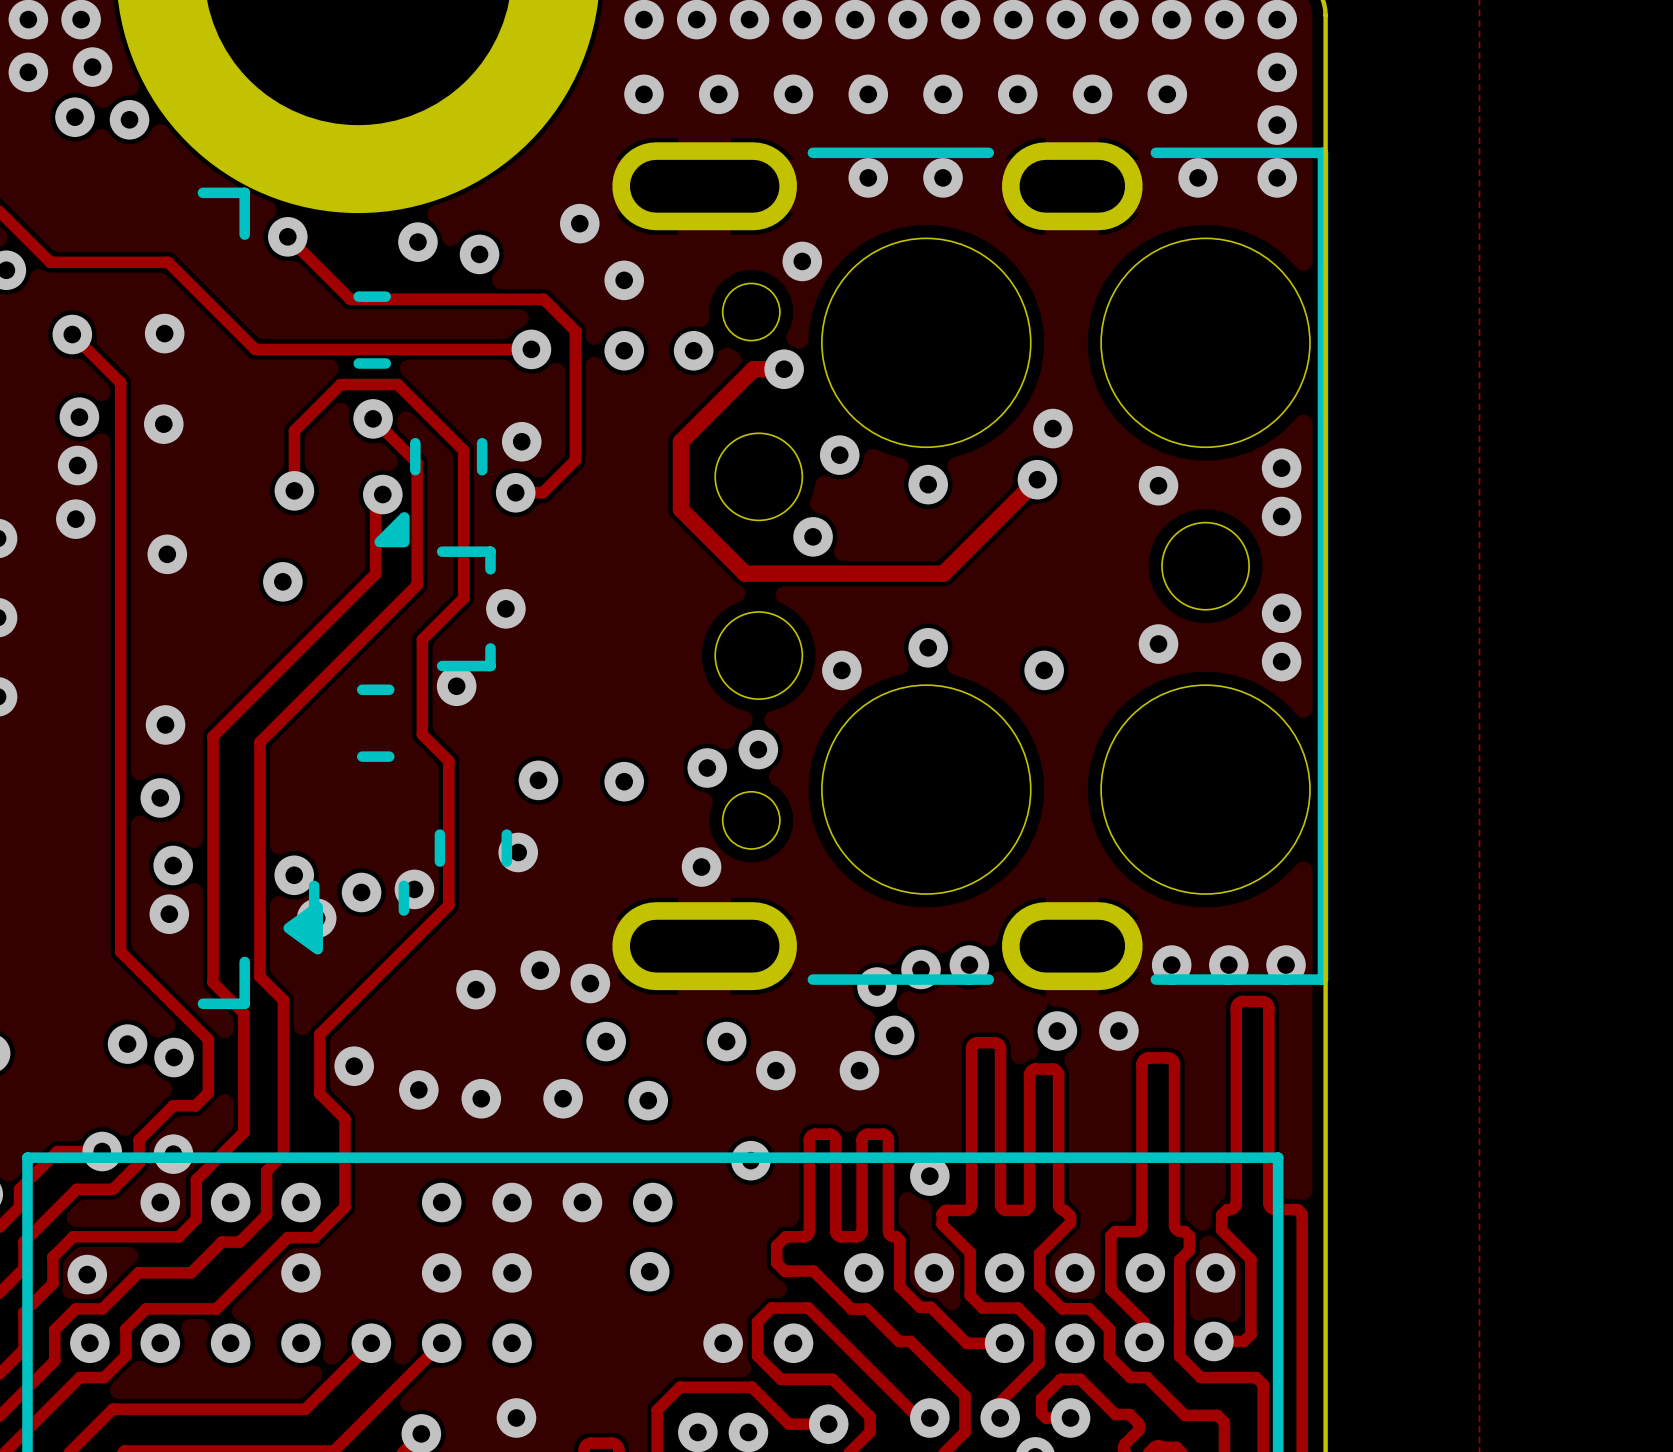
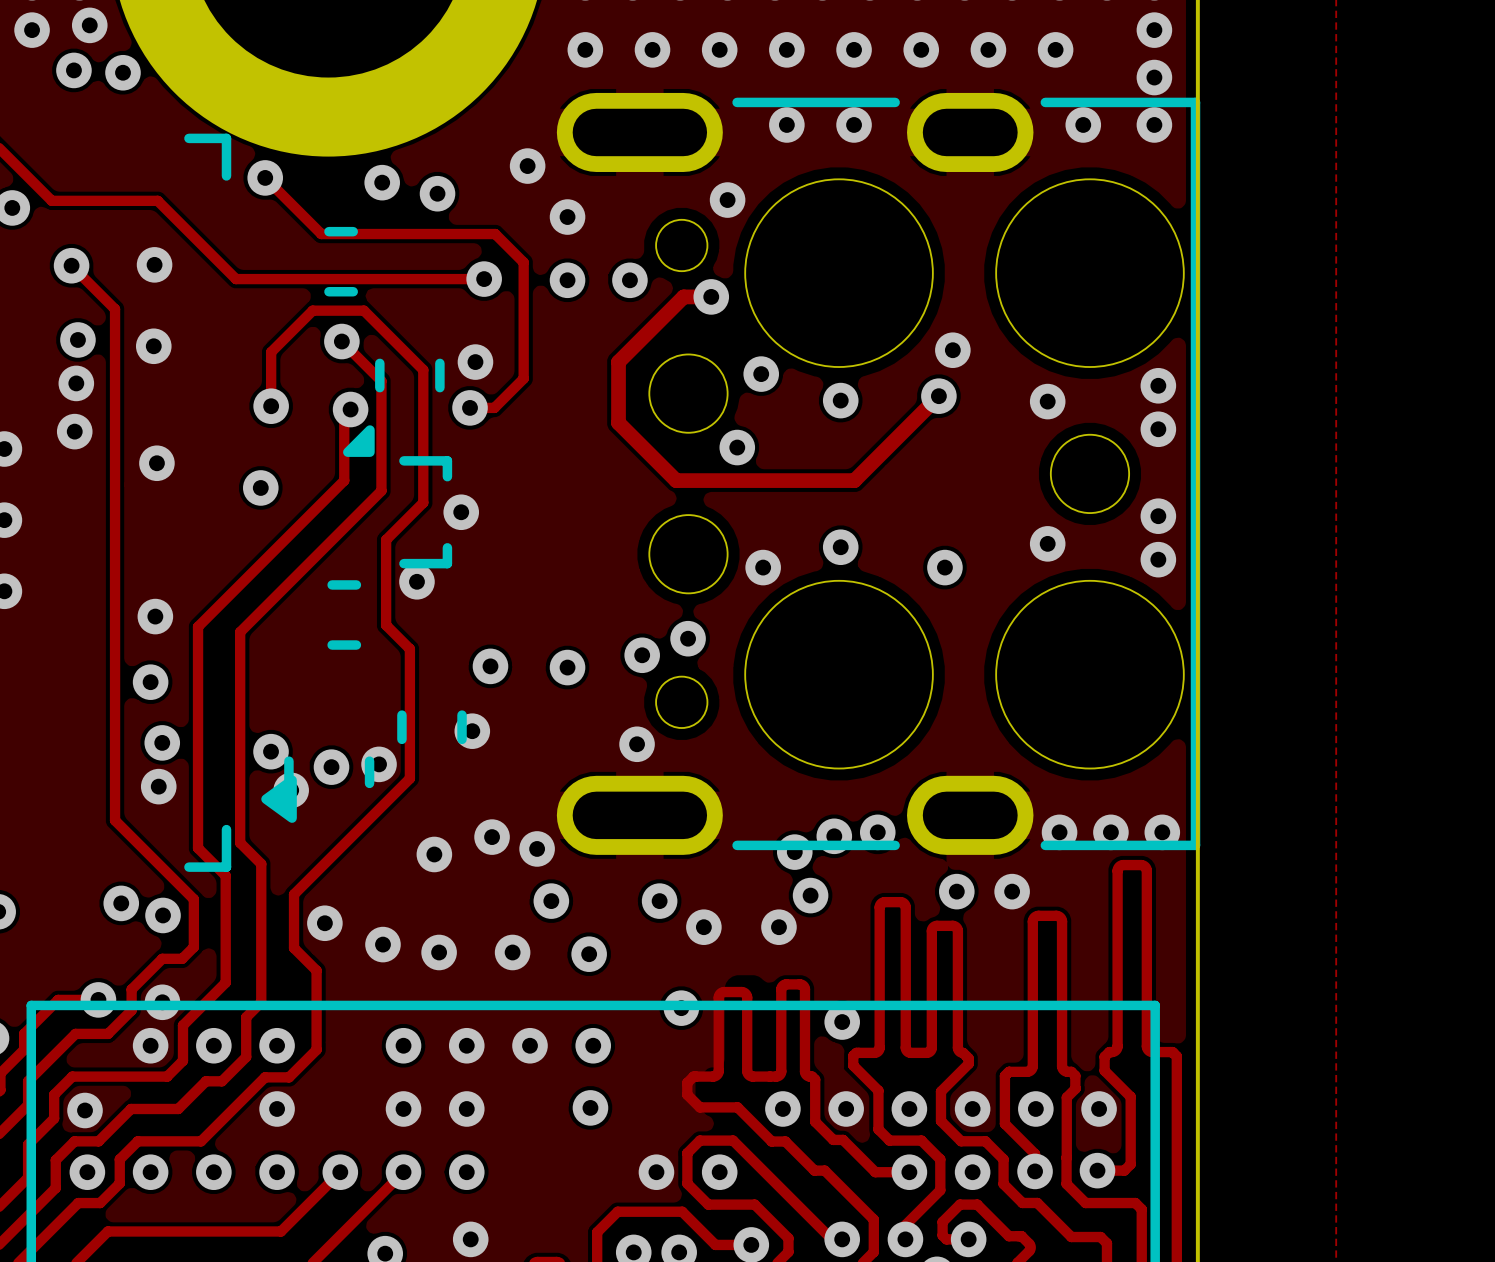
track: (785, 1236) (776, 1245) (776, 1263) (784, 1271) -> (712, 1076) (693, 1076) (687, 1082) (687, 1094) (699, 1107) (711, 1107)
track: (786, 1236) (804, 1236) (809, 1232) (809, 1139) (815, 1134) (831, 1134) (835, 1138) (835, 1231) (841, 1236) -> (713, 1076) (718, 1071) (718, 997) (724, 992) (742, 992) (746, 995) (747, 1072) (751, 1076) (762, 1076)

